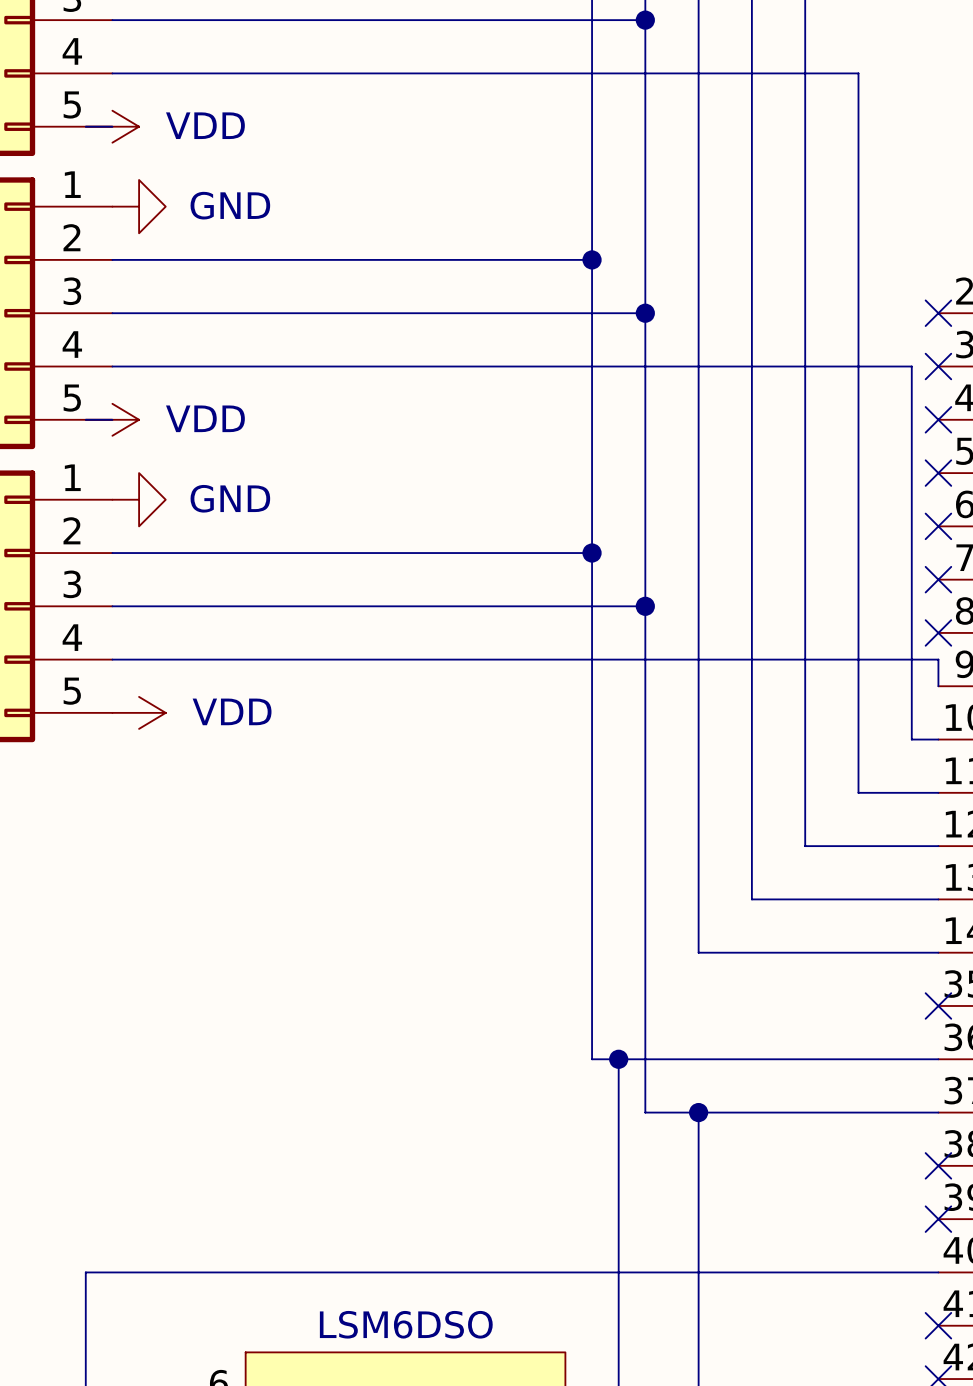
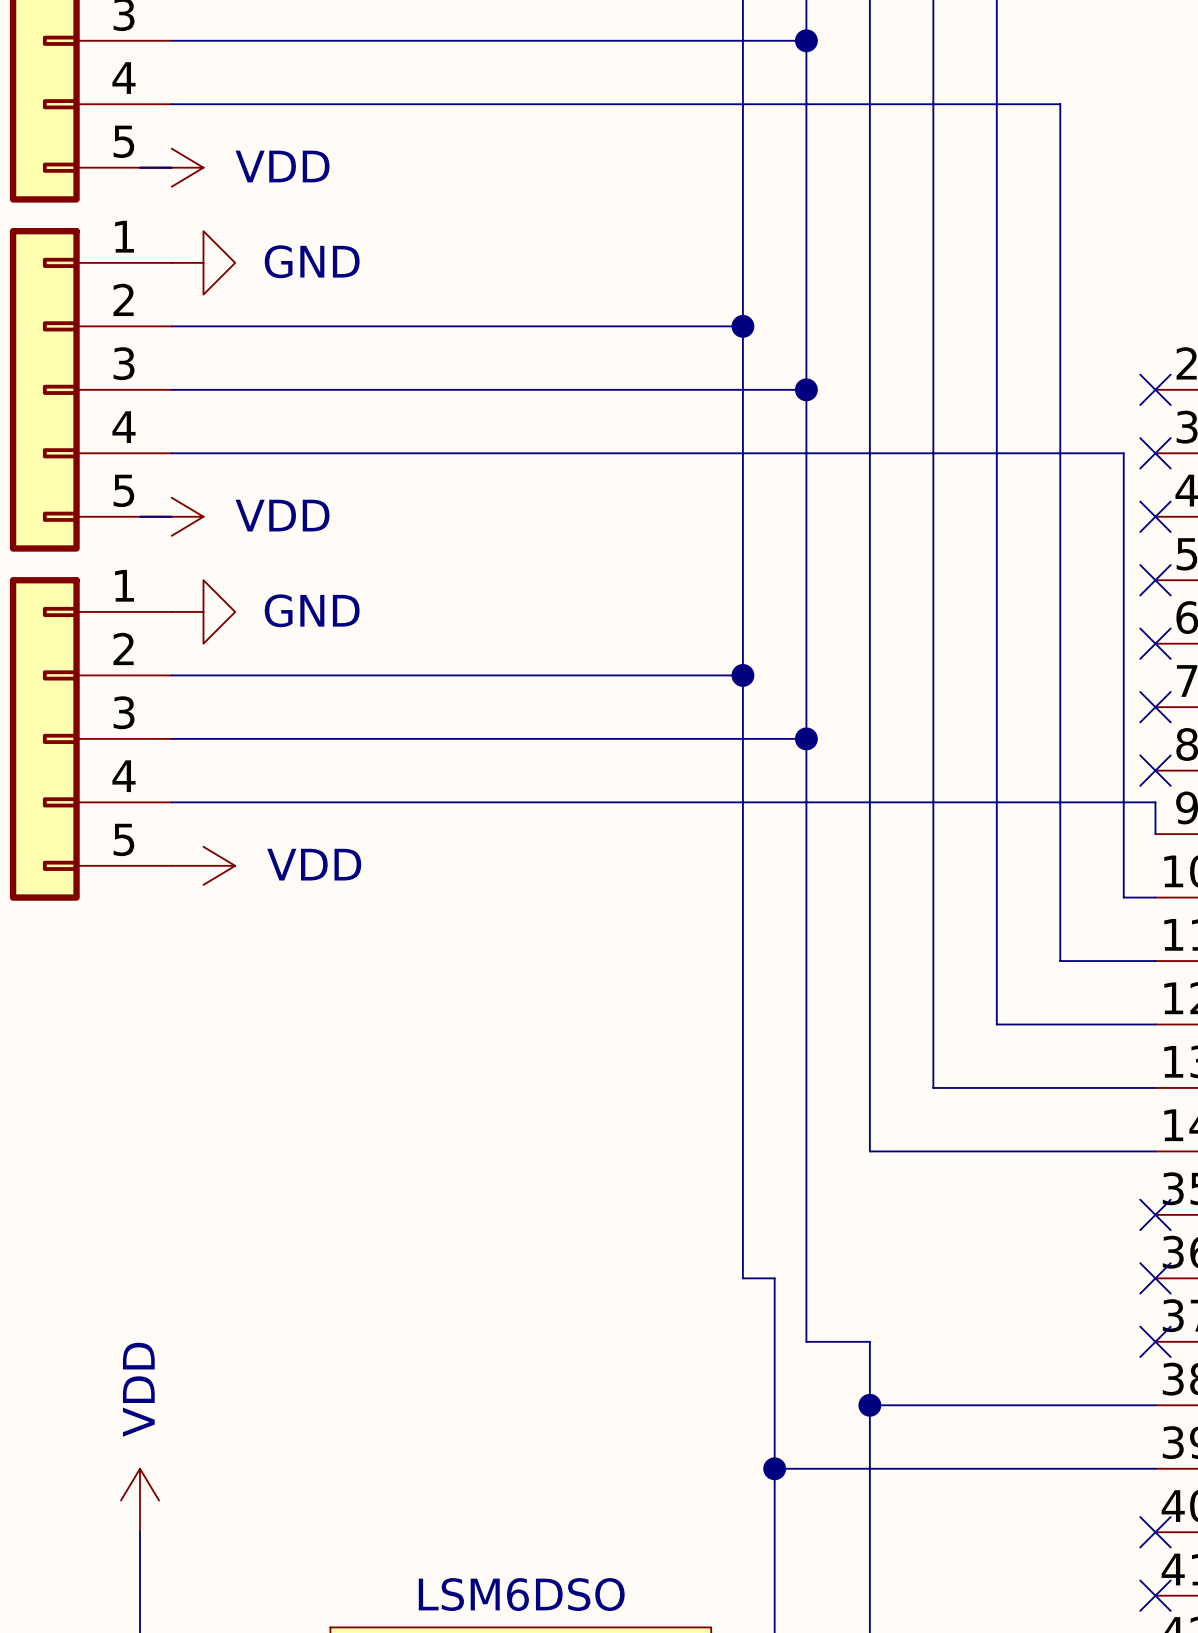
wire: (618, 1059) (938, 1059) -> (774, 1468) (1155, 1468)
junction: (618, 1059) -> none
no-connect mark: none -> (1155, 1278)
wire: (698, 1112) (938, 1112) -> (869, 1405) (1155, 1405)
junction position: (698, 1112) -> (869, 1405)
no-connect mark: none -> (1155, 1341)
no-connect mark: (938, 1165) -> none
junction: none -> (774, 1468)
no-connect mark: (938, 1219) -> none
power symbol: none -> VDD (140, 1500)
wire: (85, 1272) (938, 1272) -> none
no-connect mark: none -> (1155, 1532)

